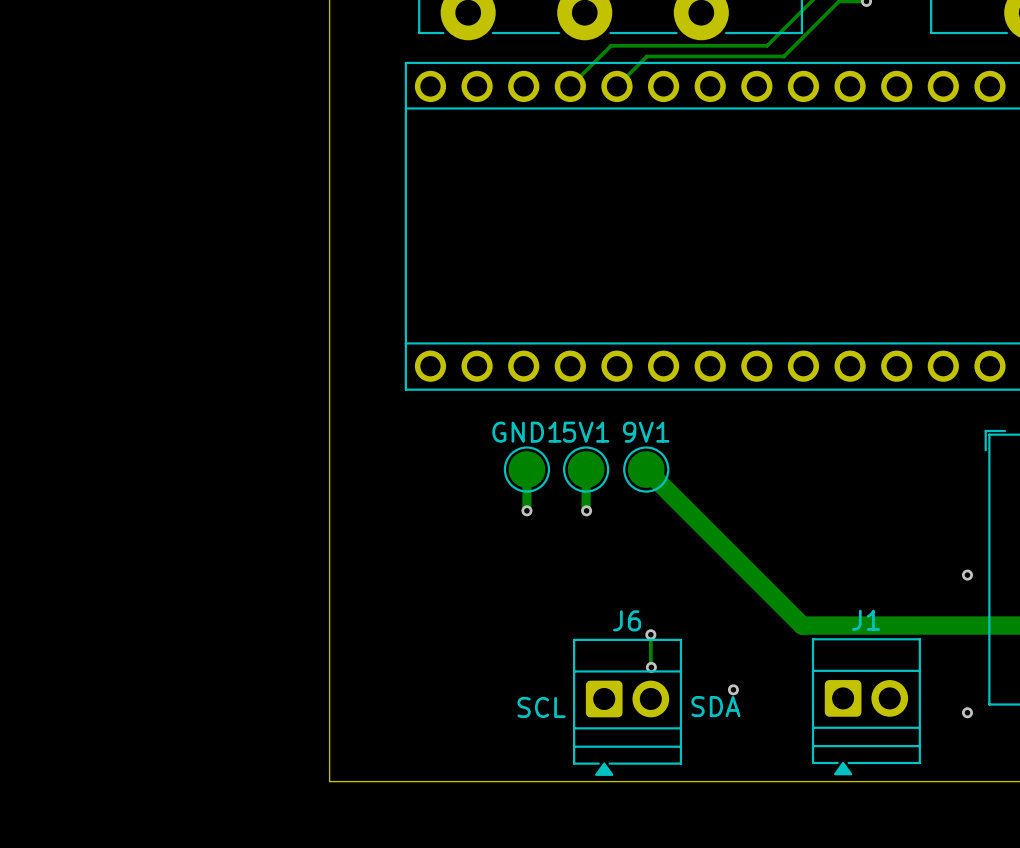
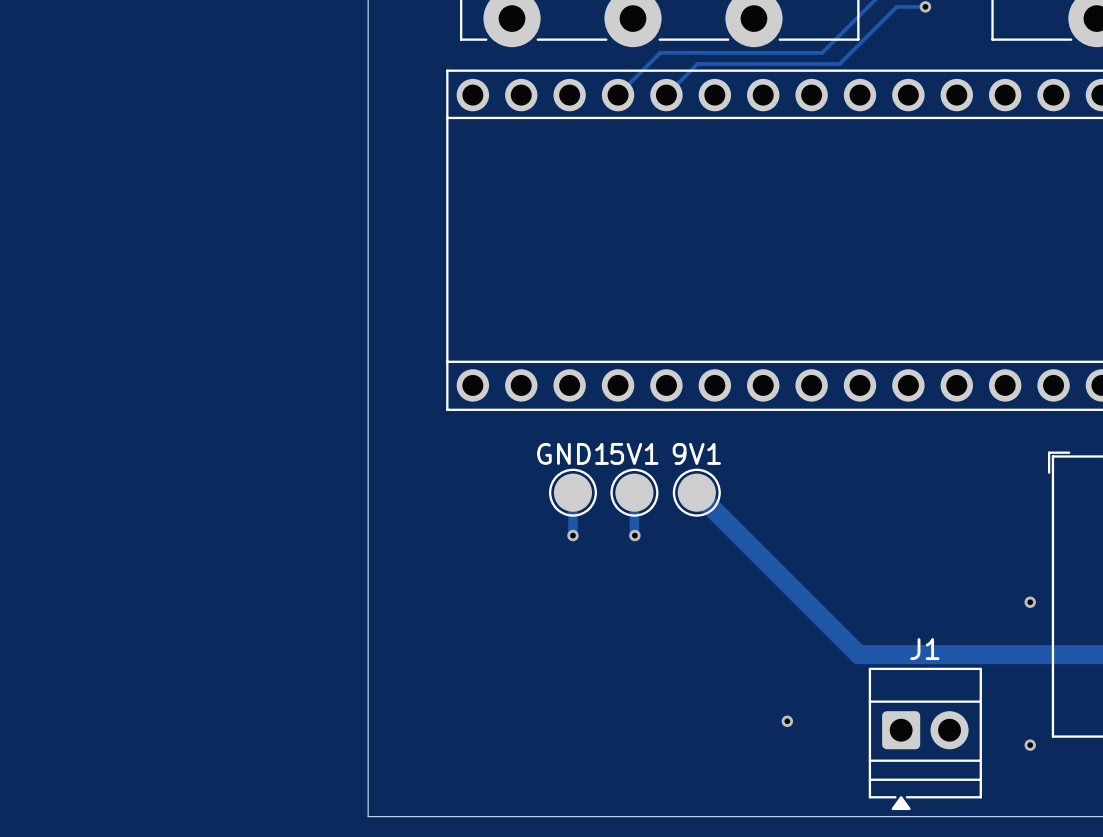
track: (650, 634) (651, 667) -> none
via: (650, 634) -> none
via: (651, 667) -> none
text: SDA (715, 706) -> none
text: SCL (541, 707) -> none
J6: (627, 707) -> none

